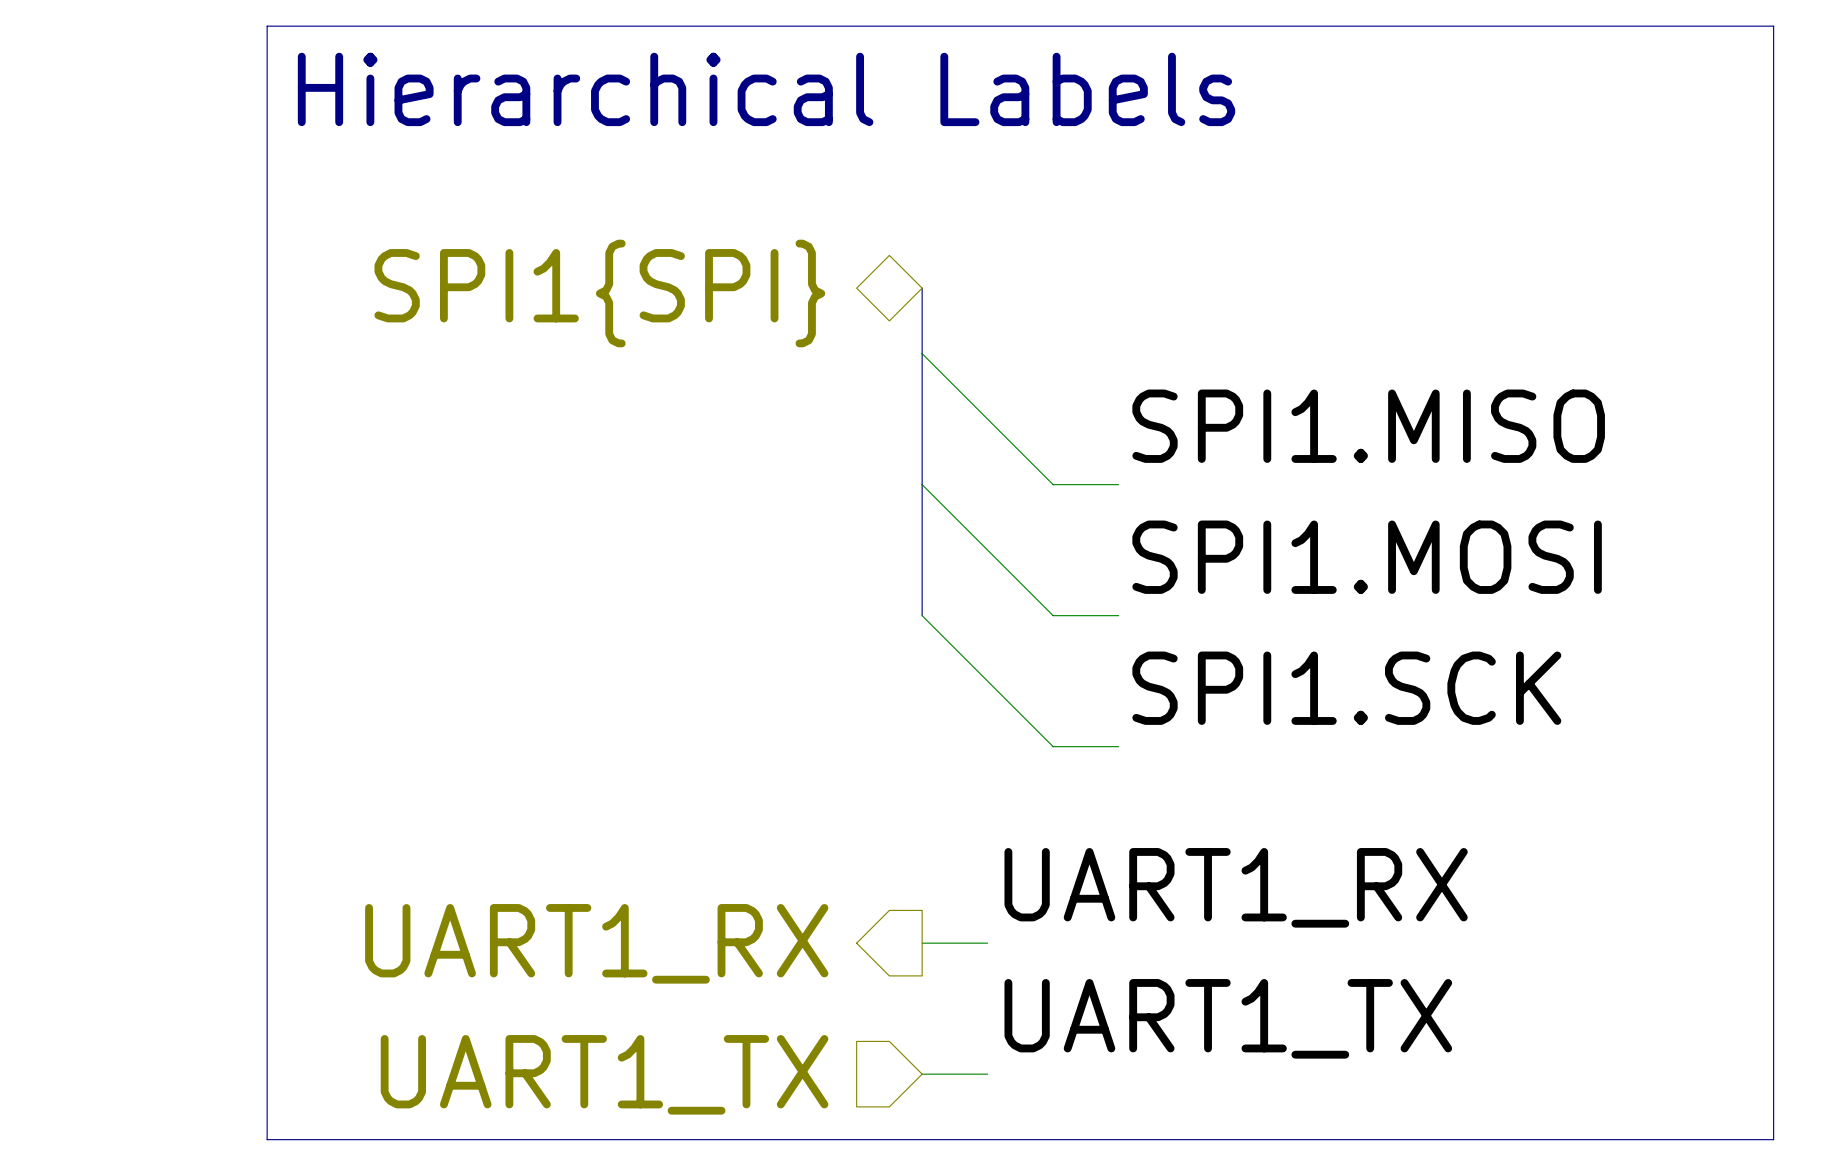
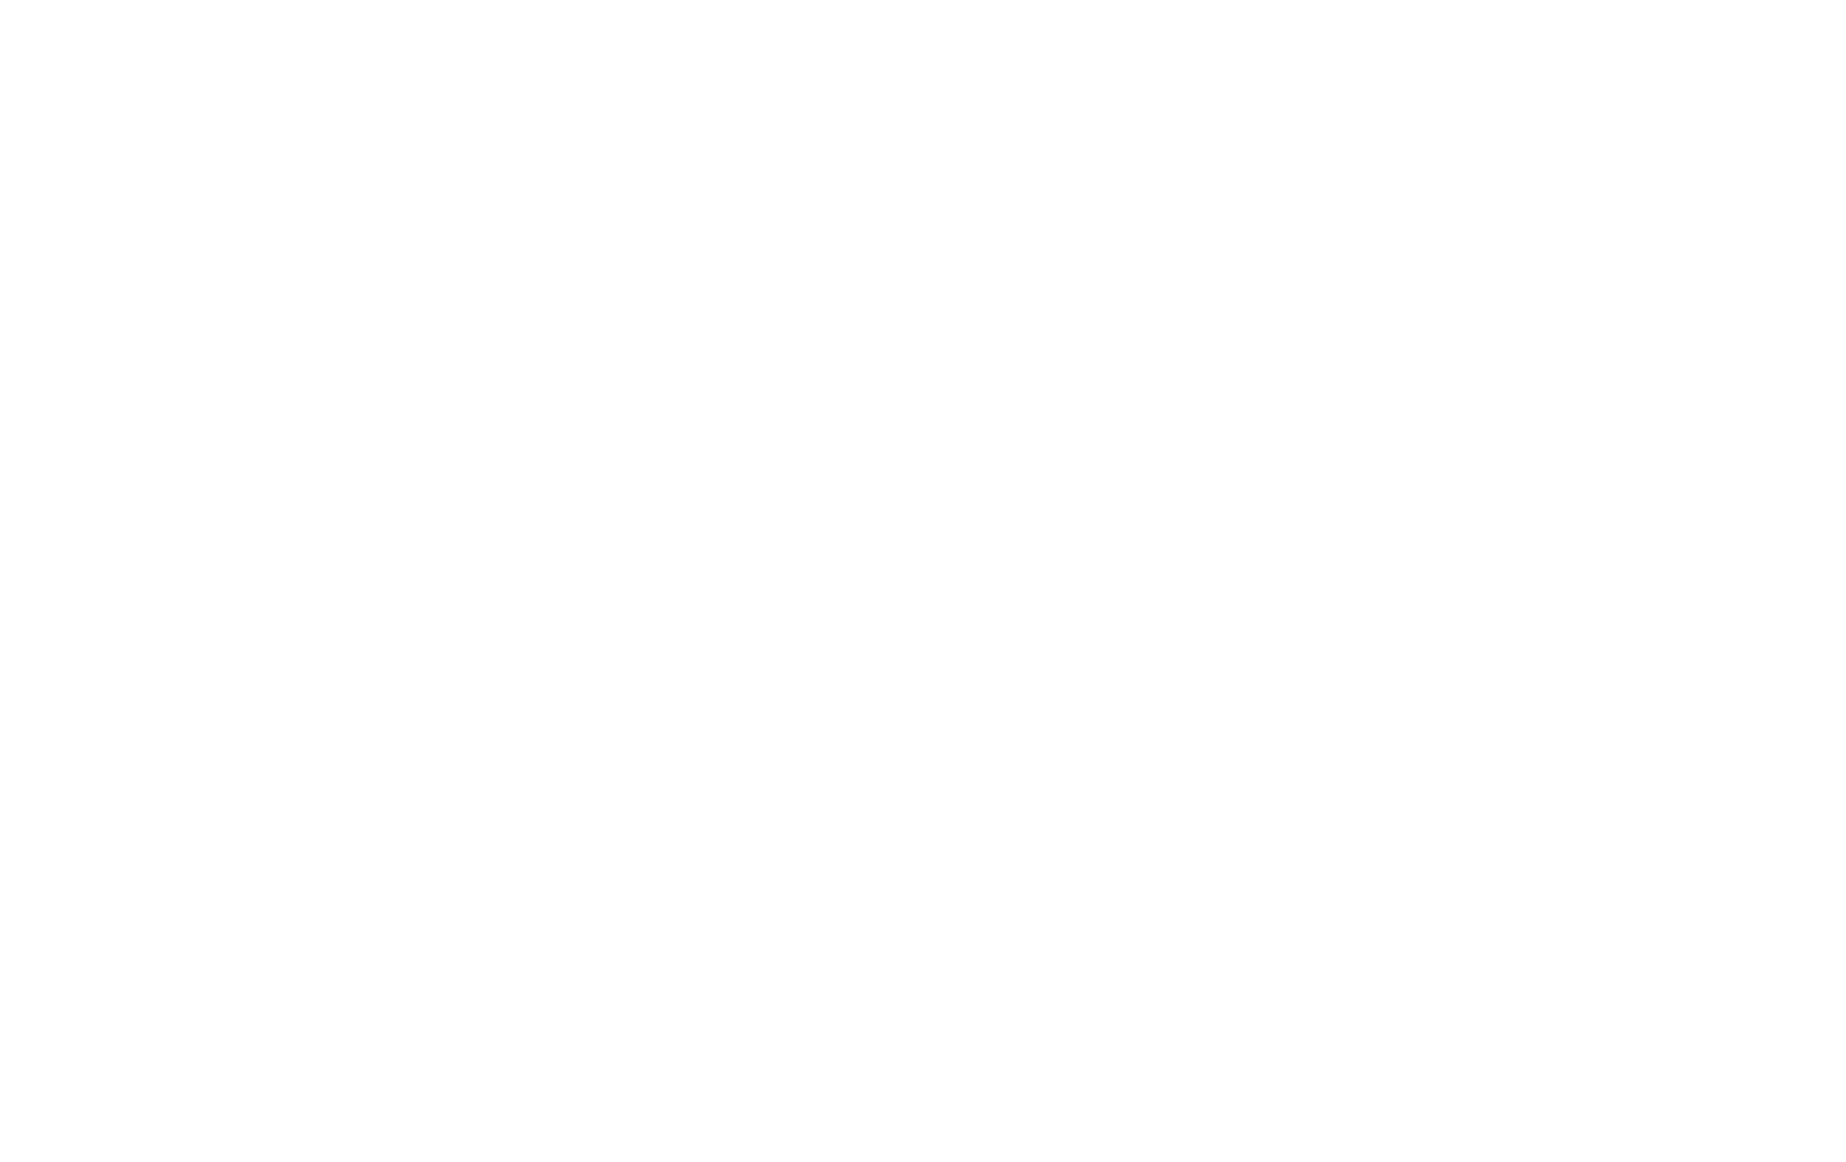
line: (267, 26) (1773, 26) (1773, 1139) (267, 1139) (267, 26) -> none
text: Hierarchical Labels (766, 89) -> none
bus: (922, 288) (922, 615) -> none
hierarchical label: SPI1{SPI} (599, 293) -> none
wire: (922, 353) (1053, 484) (1118, 484) -> none
label: SPI1.MISO (1368, 426) -> none
wire: (922, 484) (1053, 615) (1118, 615) -> none
label: SPI1.MOSI (1367, 557) -> none
wire: (922, 615) (1053, 746) (1118, 746) -> none
label: SPI1.SCK (1346, 688) -> none
label: UART1_RX (1236, 887) -> none
hierarchical label: UART1_RX (596, 943) -> none
wire: (922, 943) (987, 943) -> none
label: UART1_TX (1228, 1018) -> none
hierarchical label: UART1_TX (604, 1074) -> none
wire: (922, 1074) (987, 1074) -> none

